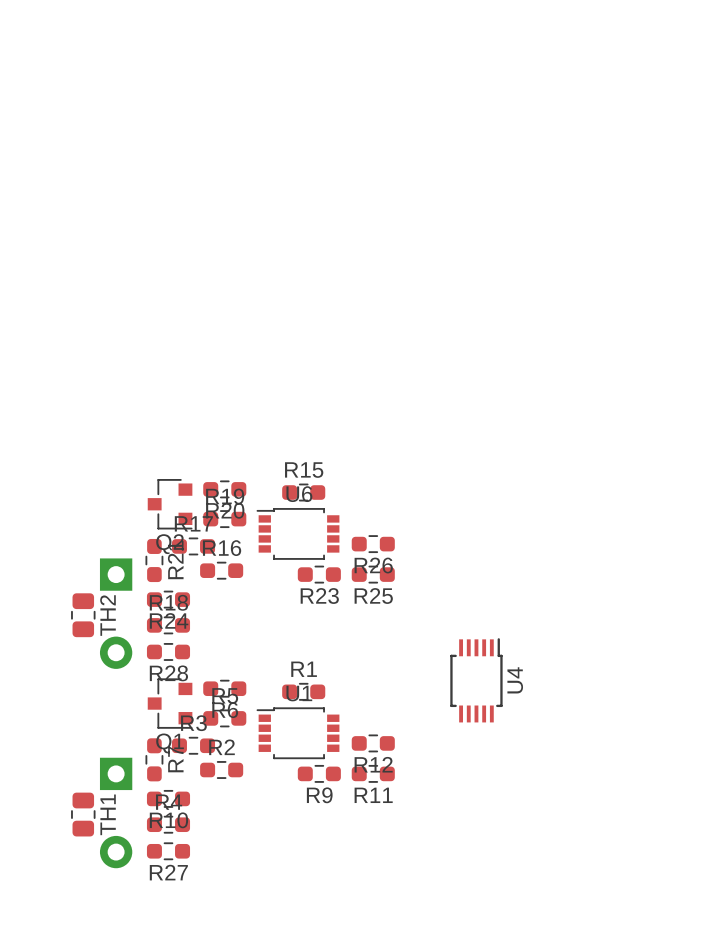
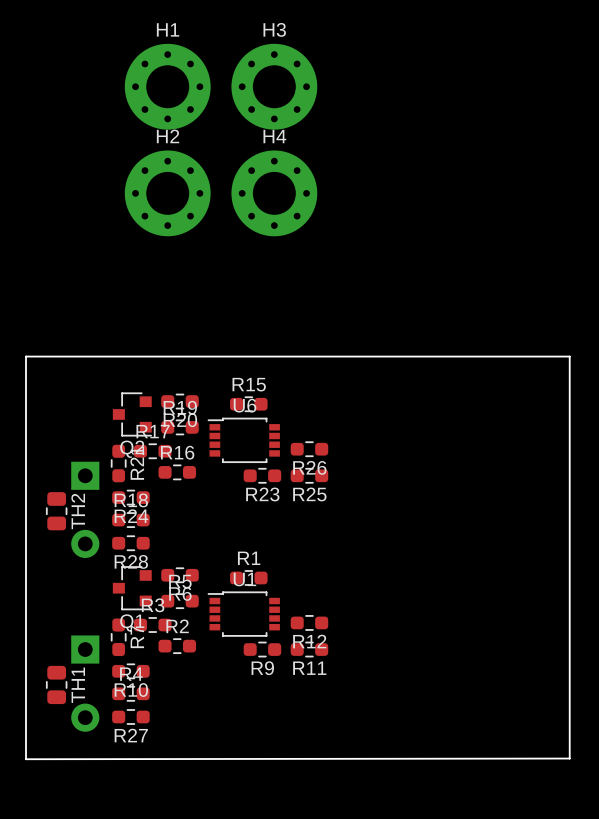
H1: none -> (167, 86)
H3: none -> (274, 86)
H2: none -> (167, 193)
H4: none -> (274, 193)
board edge: none -> (26, 356) (569, 356) (569, 758) (26, 759) (26, 356)
U4: (476, 680) -> none

